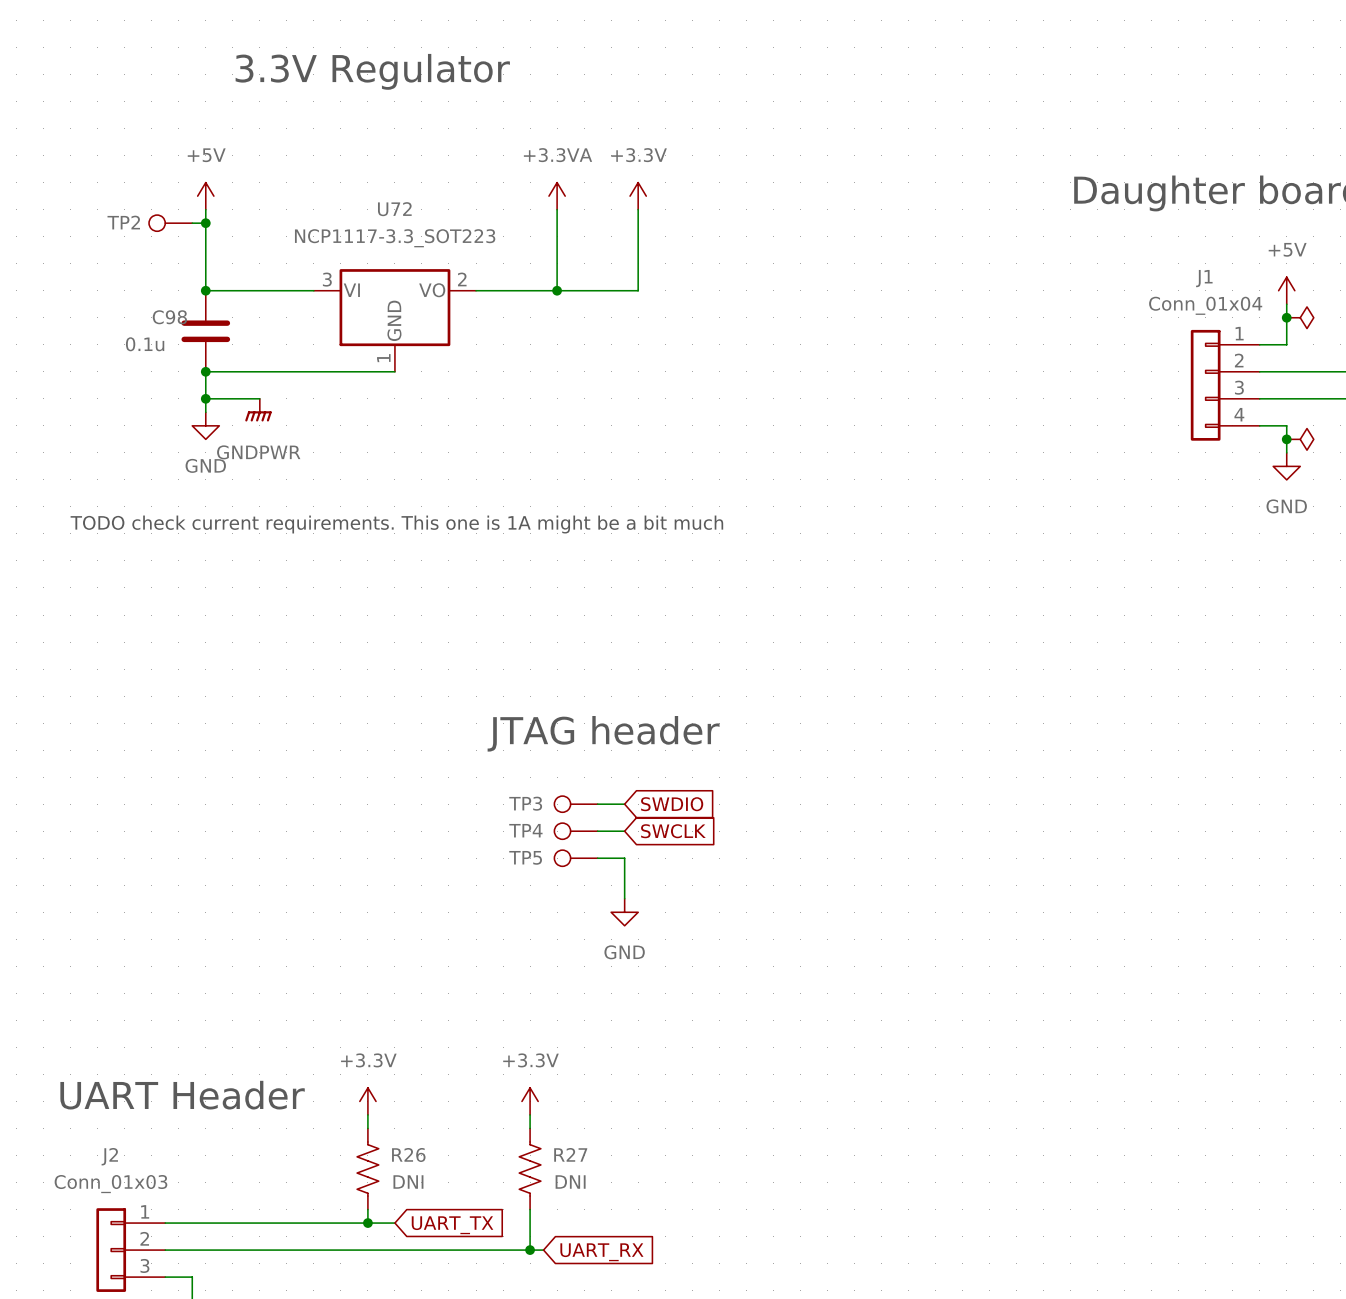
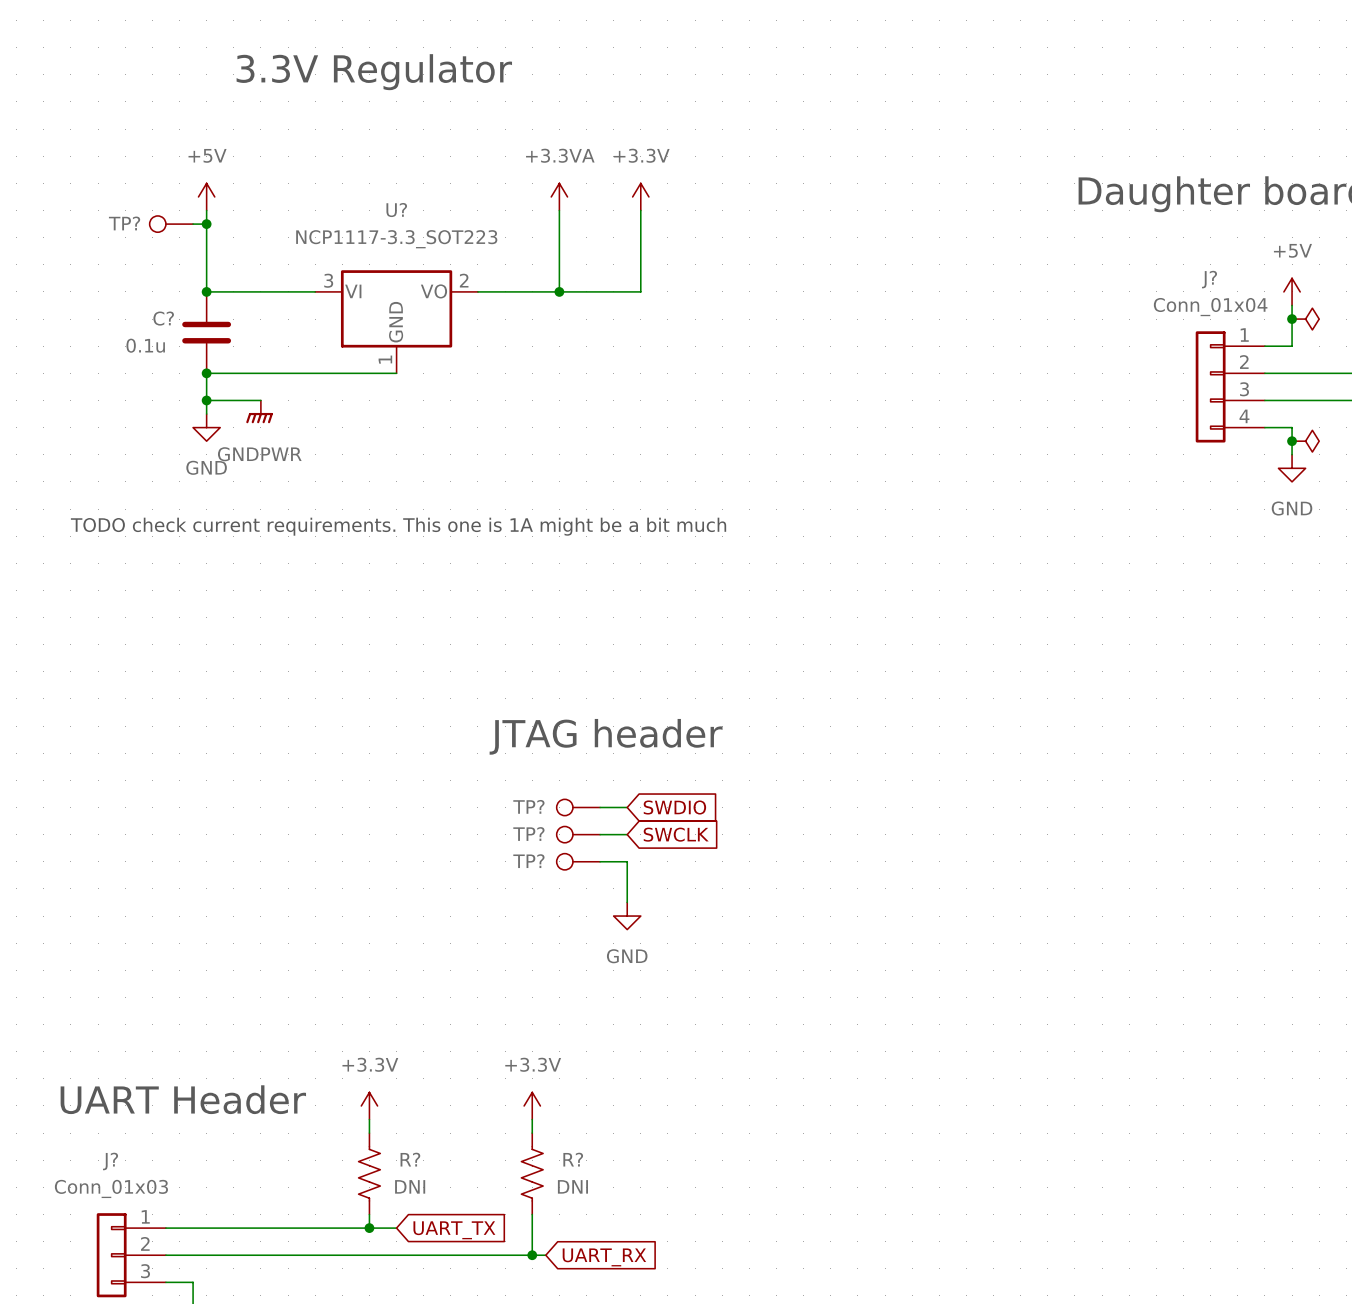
U72 name: U72 (394, 209) -> U? (396, 210)
TP2 name: TP2 (123, 222) -> TP? (124, 223)
J1 name: J1 (1204, 278) -> J? (1209, 279)
C98 name: C98 (169, 317) -> C? (163, 318)
TP3 name: TP3 (525, 803) -> TP? (528, 806)
TP4 name: TP4 (525, 830) -> TP? (528, 834)
TP5 name: TP5 (525, 857) -> TP? (528, 861)
R26 name: R26 (408, 1154) -> R? (410, 1159)
R27 name: R27 (570, 1154) -> R? (573, 1159)
J2 name: J2 (109, 1156) -> J? (110, 1161)

